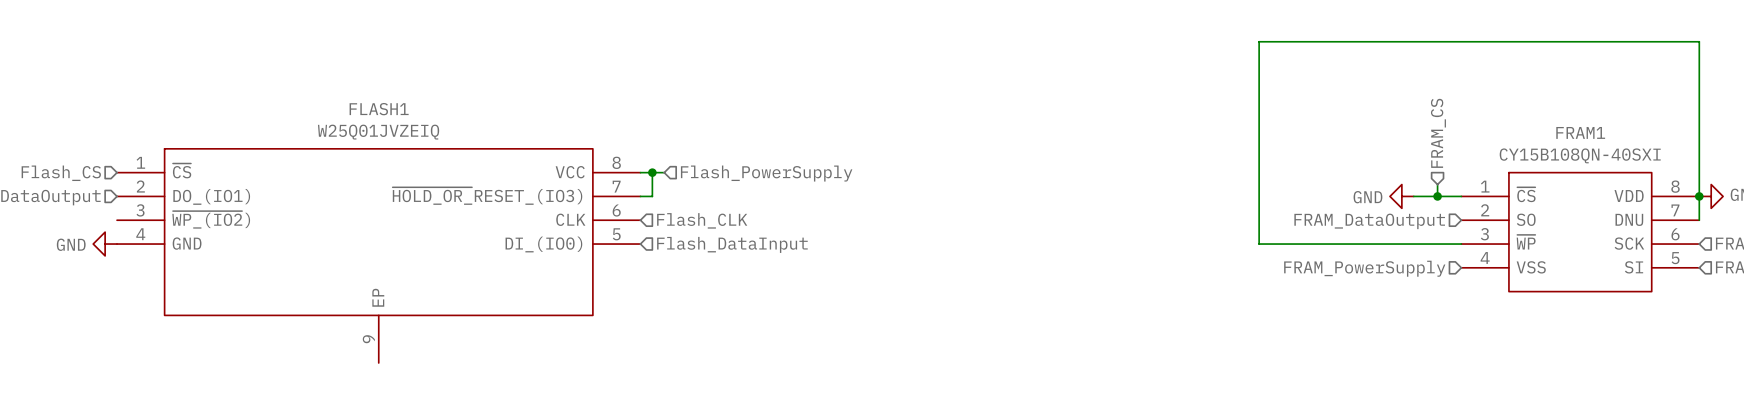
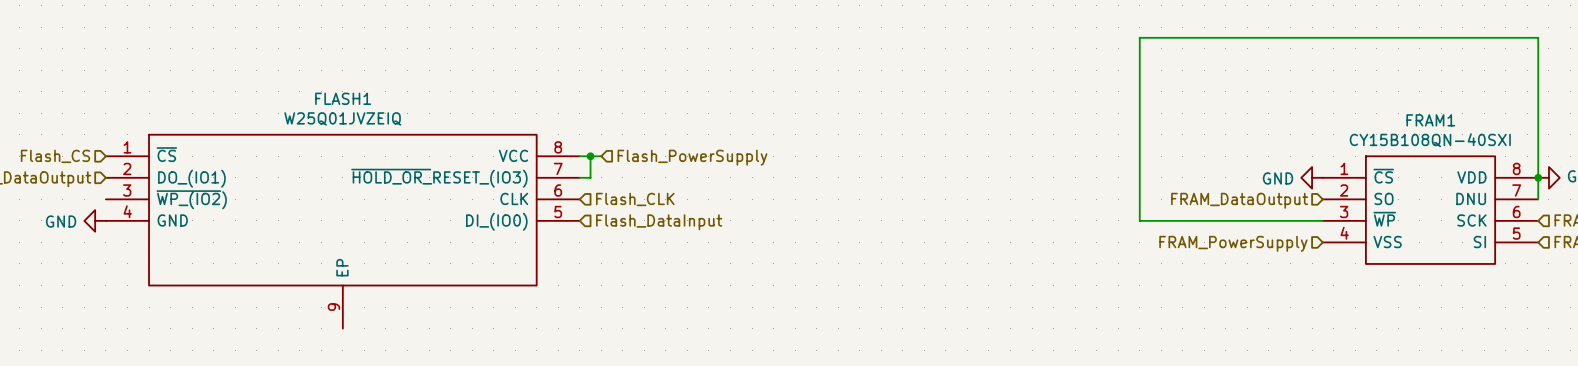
hierarchical label: FRAM_CS (1438, 133) -> none
wire: (1437, 184) (1437, 196) -> none
power symbol position: GND (1401, 196) -> GND (1312, 177)
wire: (1413, 196) (1461, 196) -> none
junction: (1437, 196) -> none

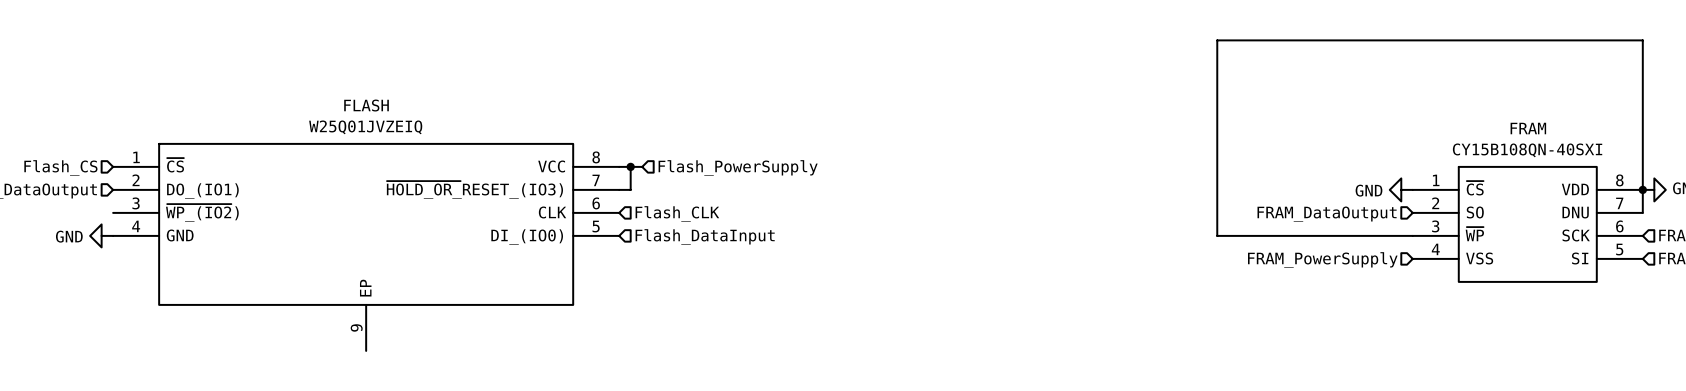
FLASH1 name: FLASH1 (343, 98) -> FLASH (366, 105)
FRAM1 name: FRAM1 (1430, 120) -> FRAM (1528, 128)

